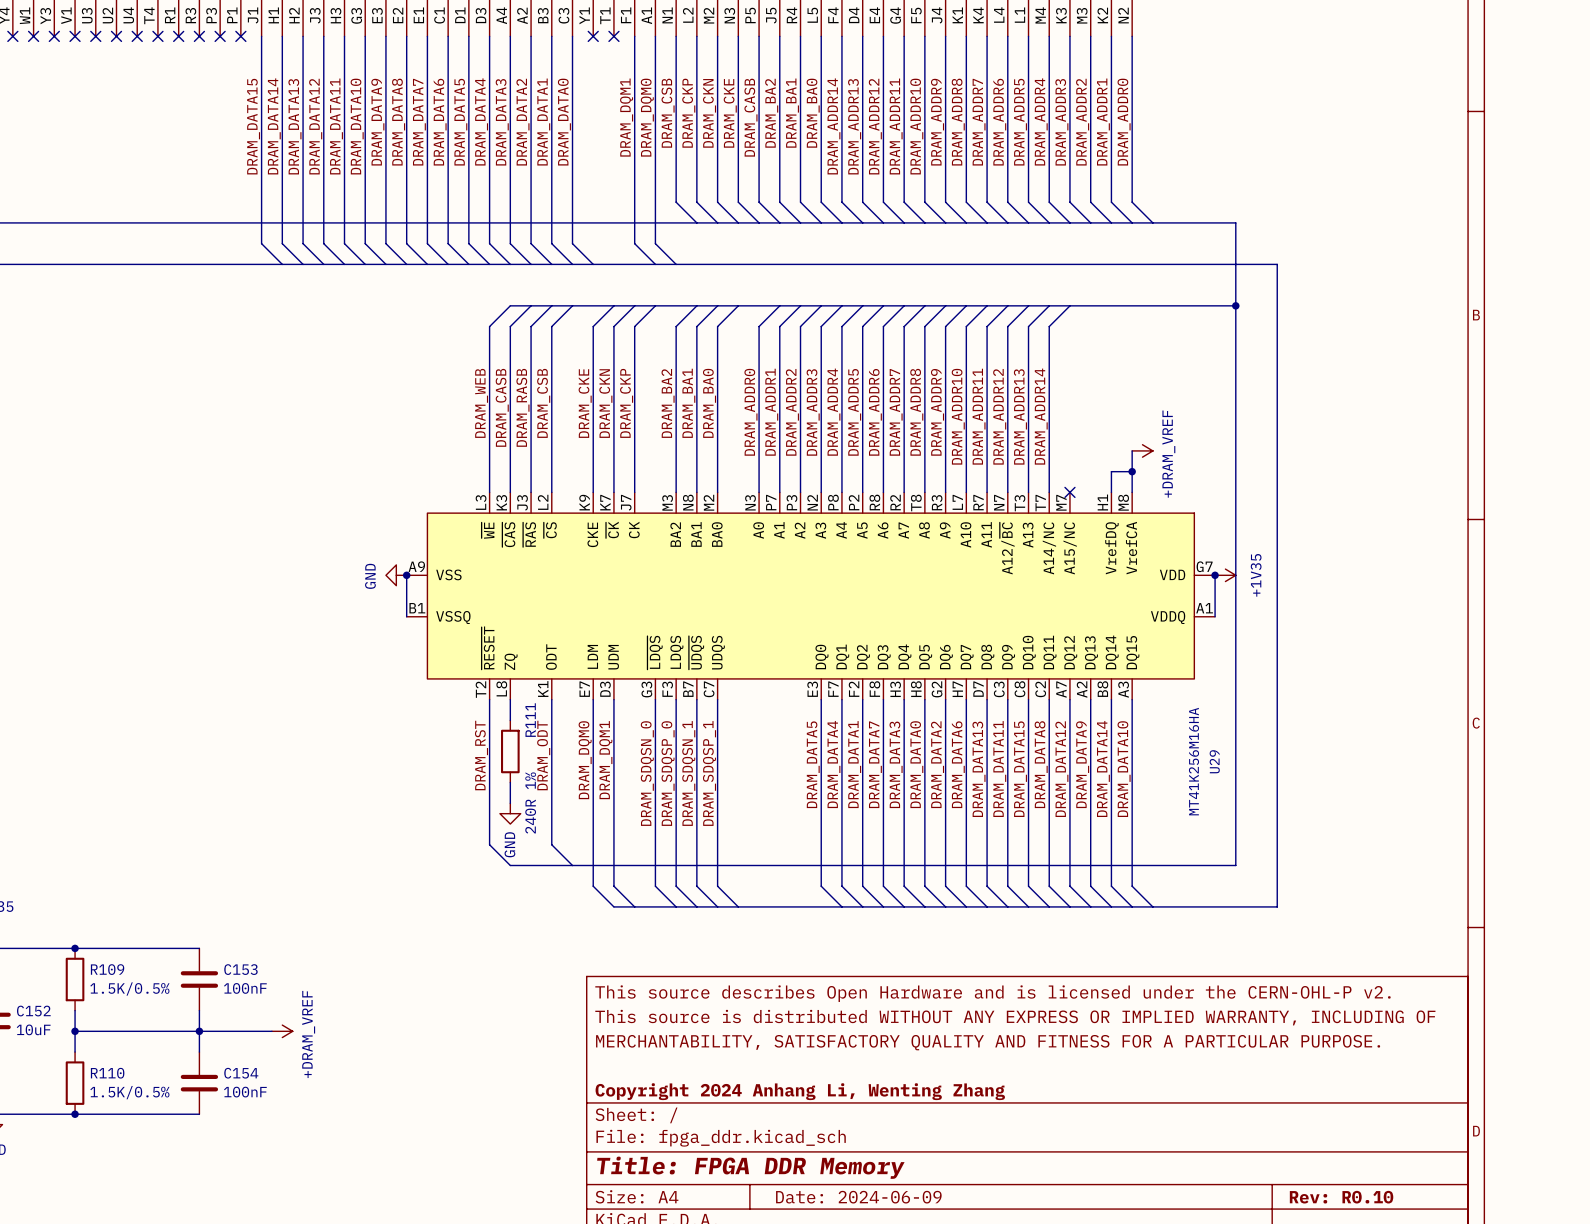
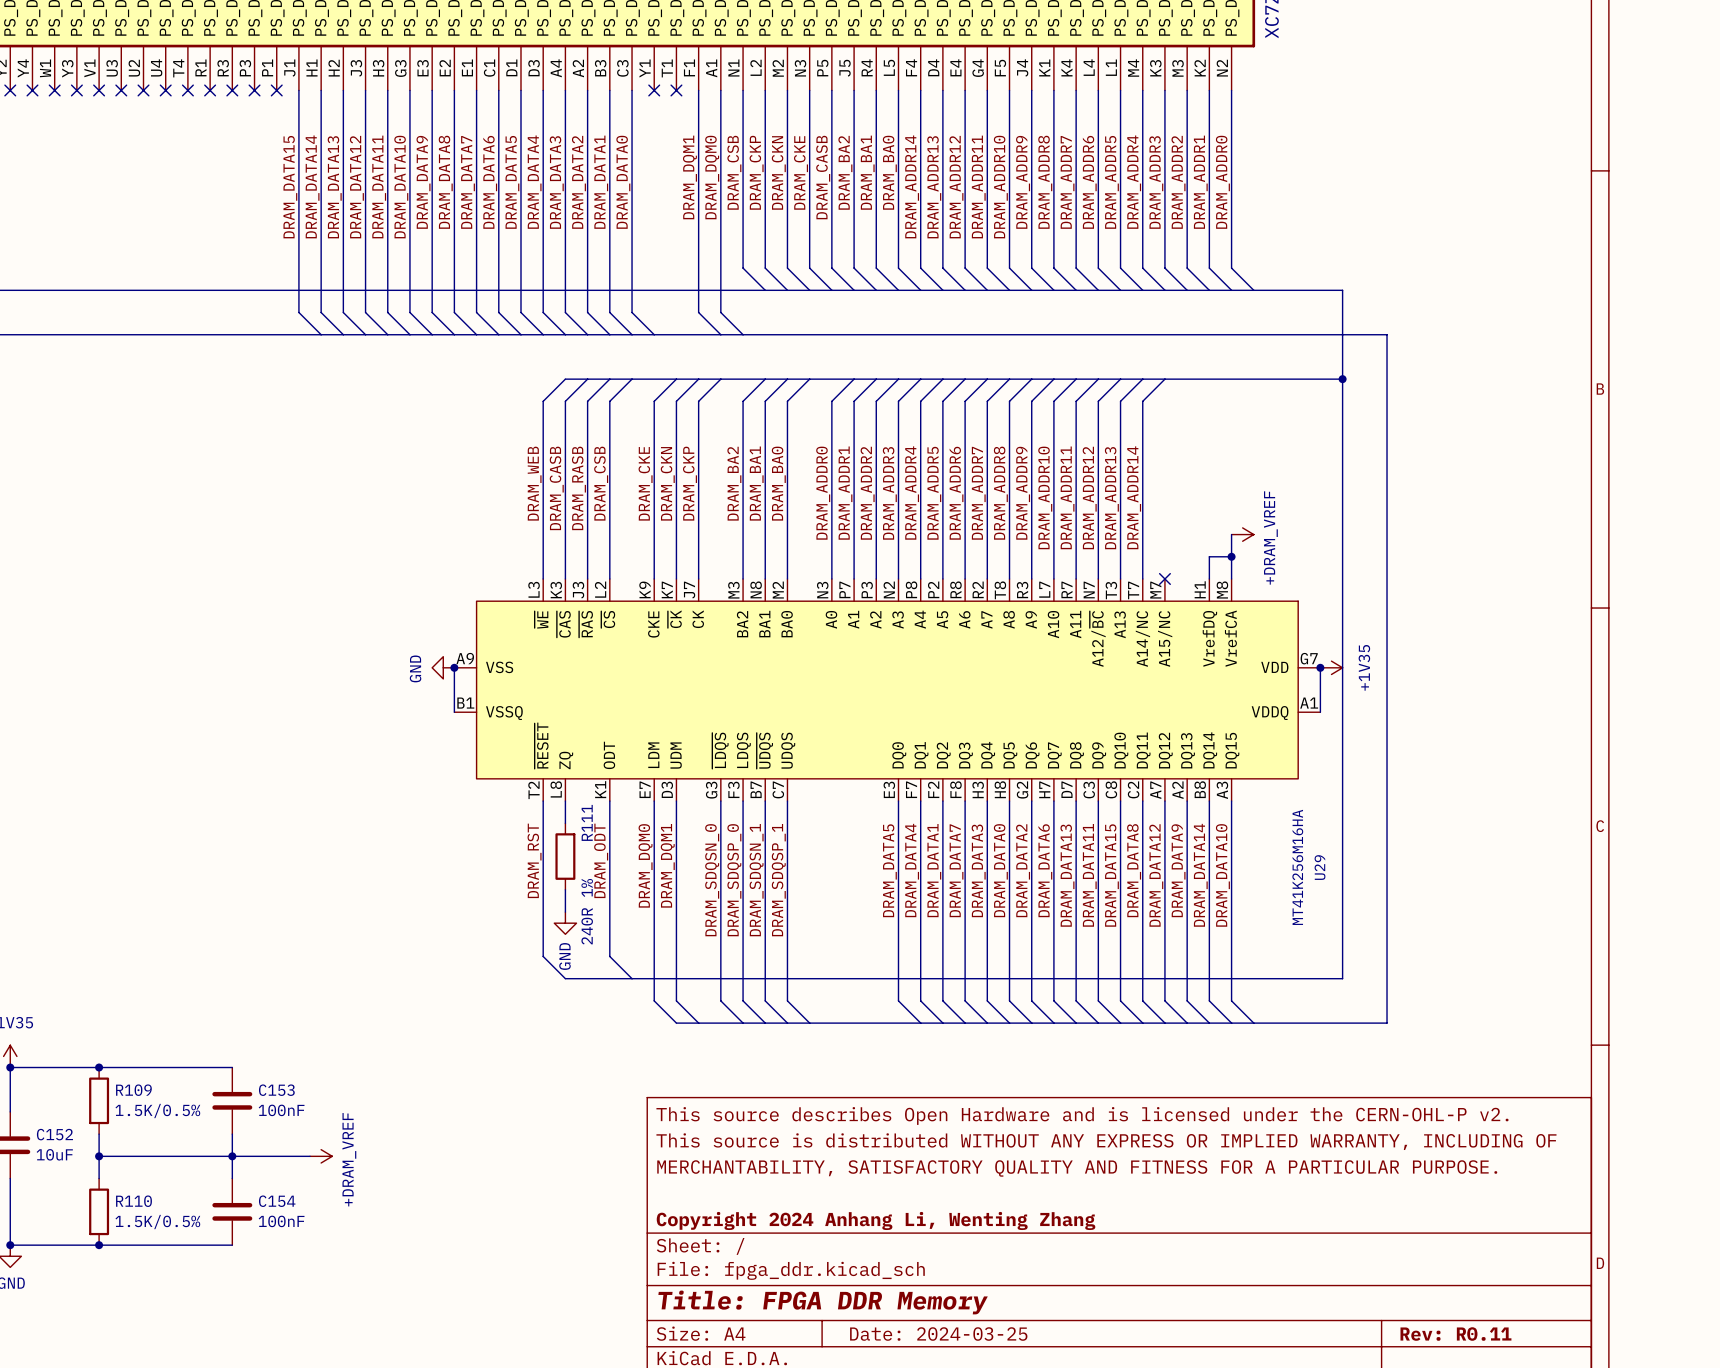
title block: Date: 2024-06-09 (858, 1197) -> Date: 2024-03-25 (938, 1334)
title block: Rev: R0.10 (1341, 1197) -> Rev: R0.11 (1455, 1334)

